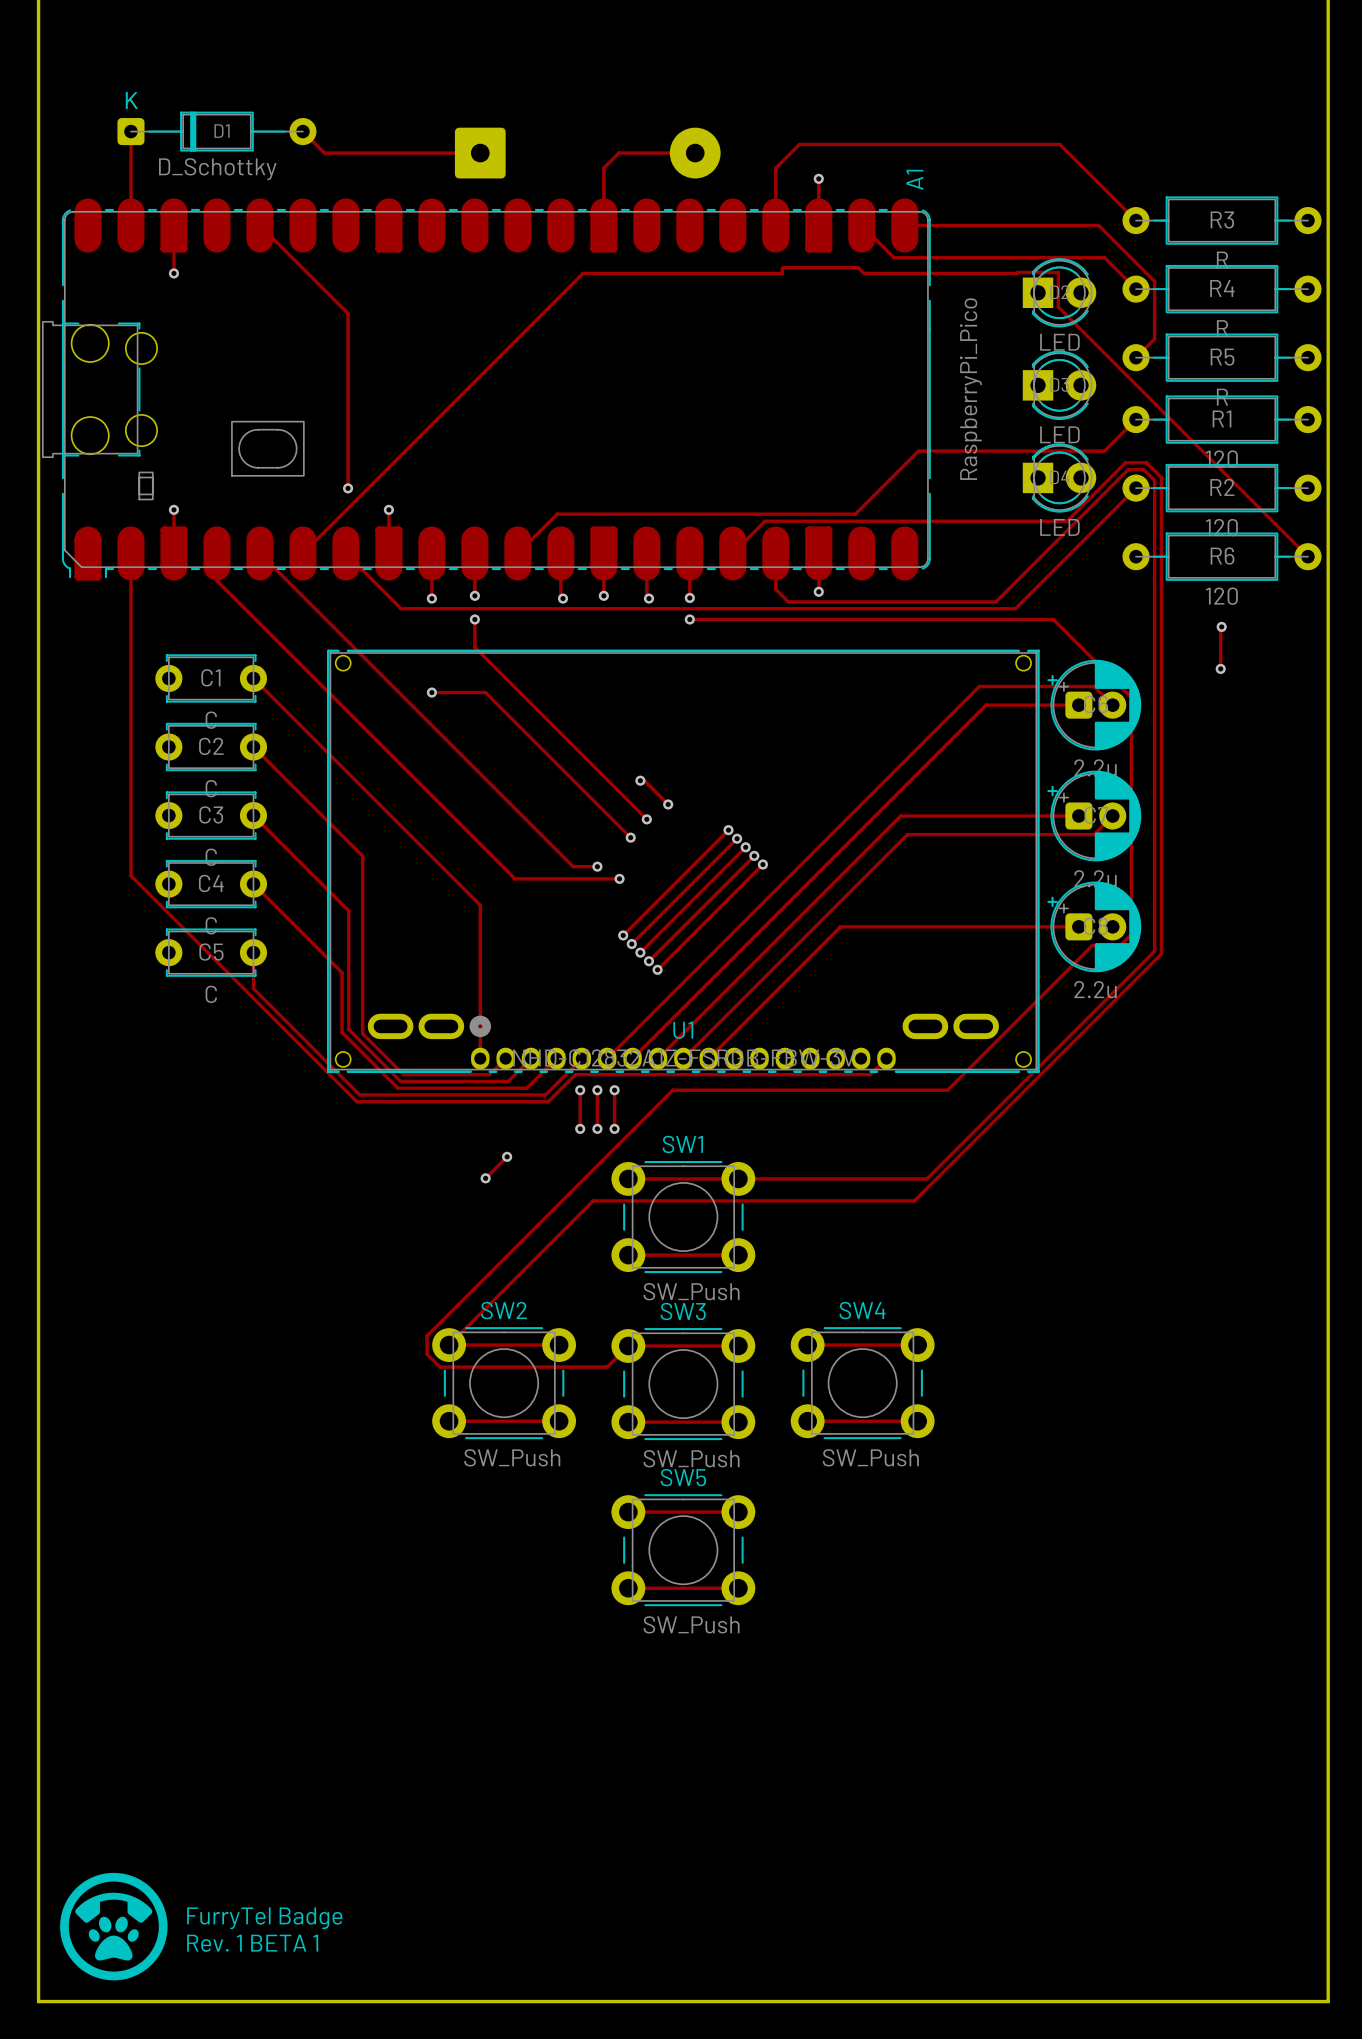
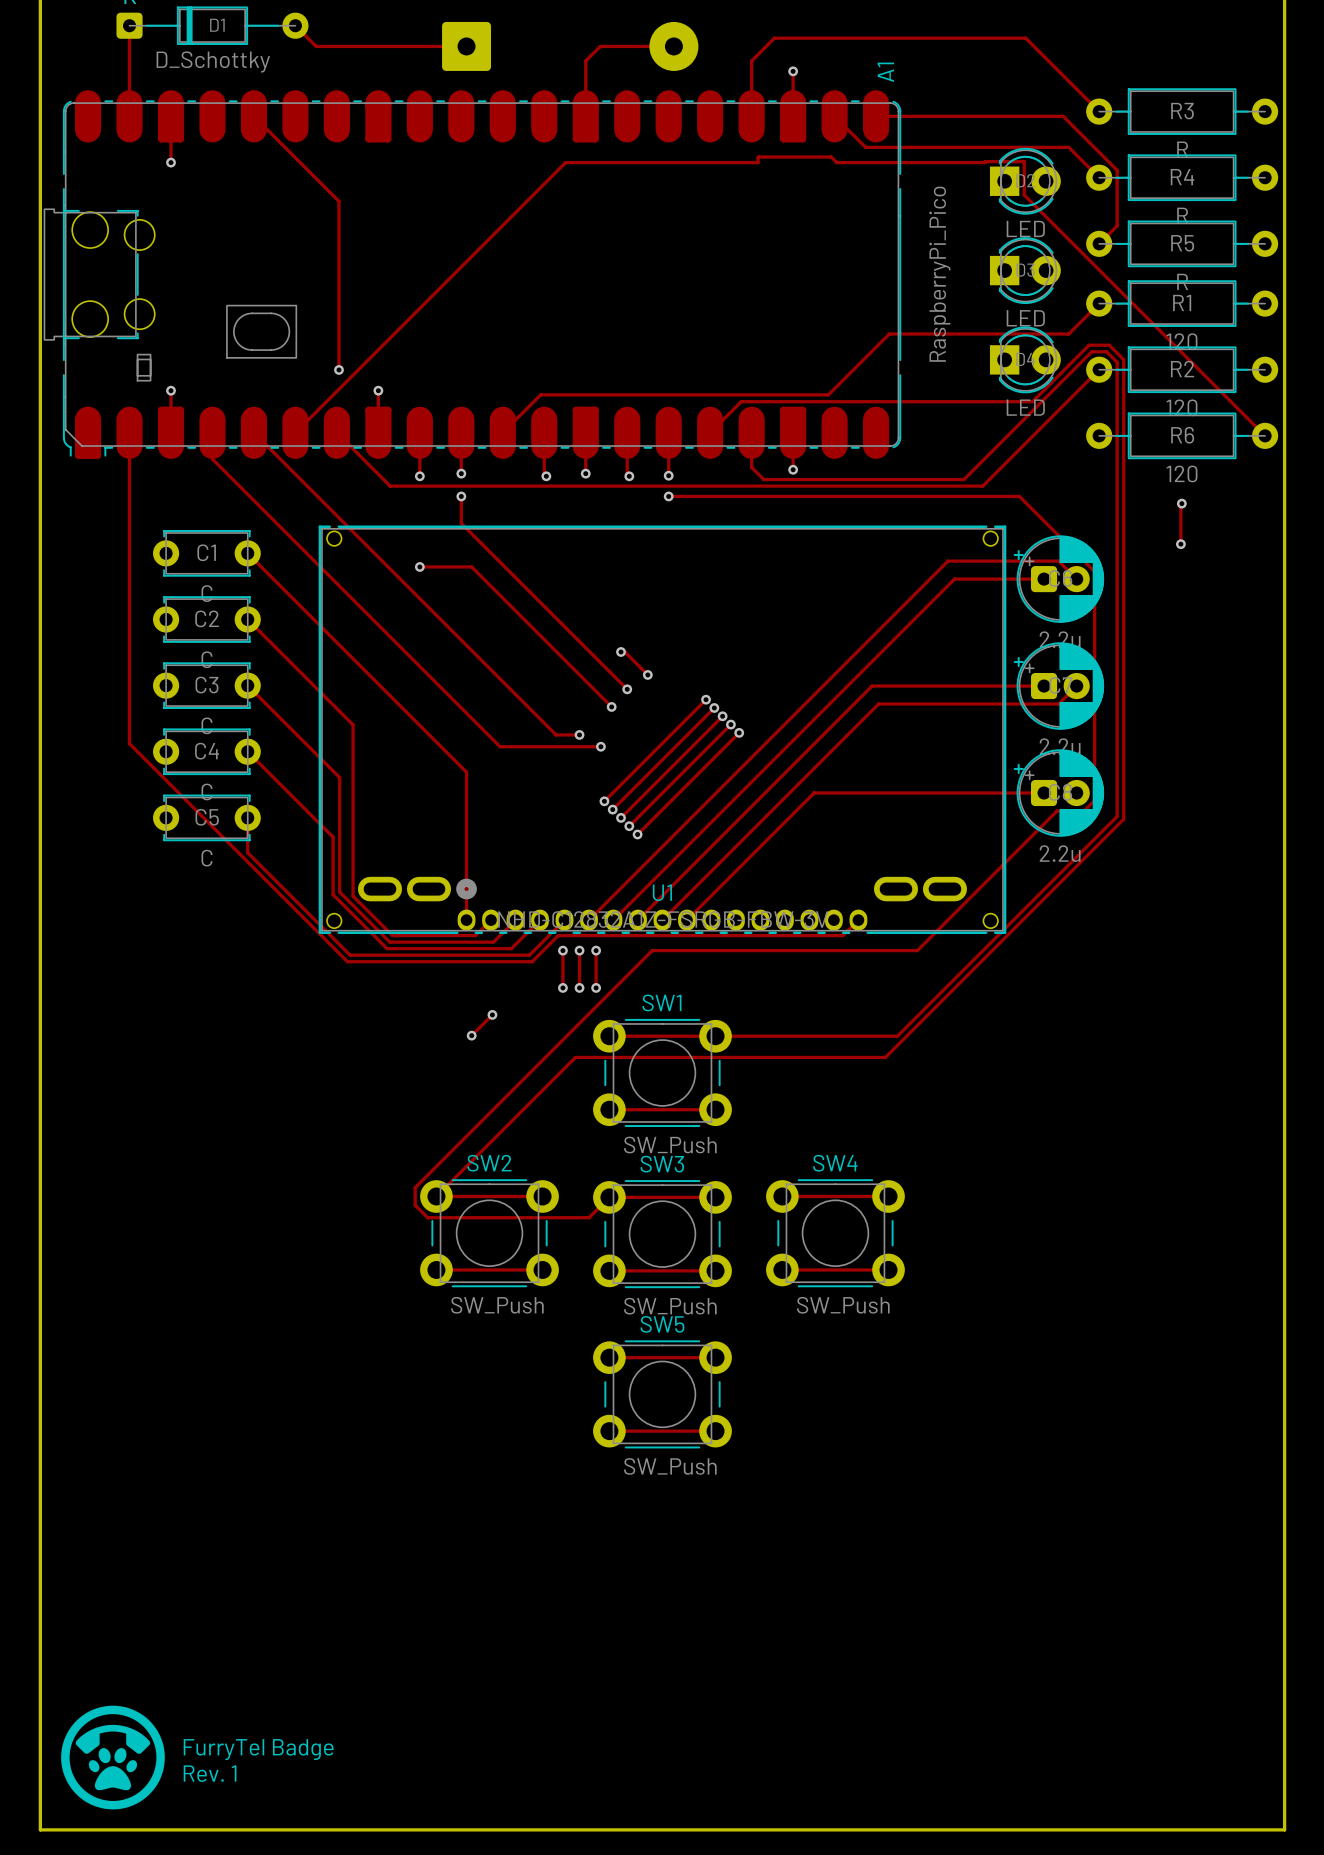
text: Rev. 1 BETA 1 (252, 1943) -> Rev. 1 (210, 1773)

